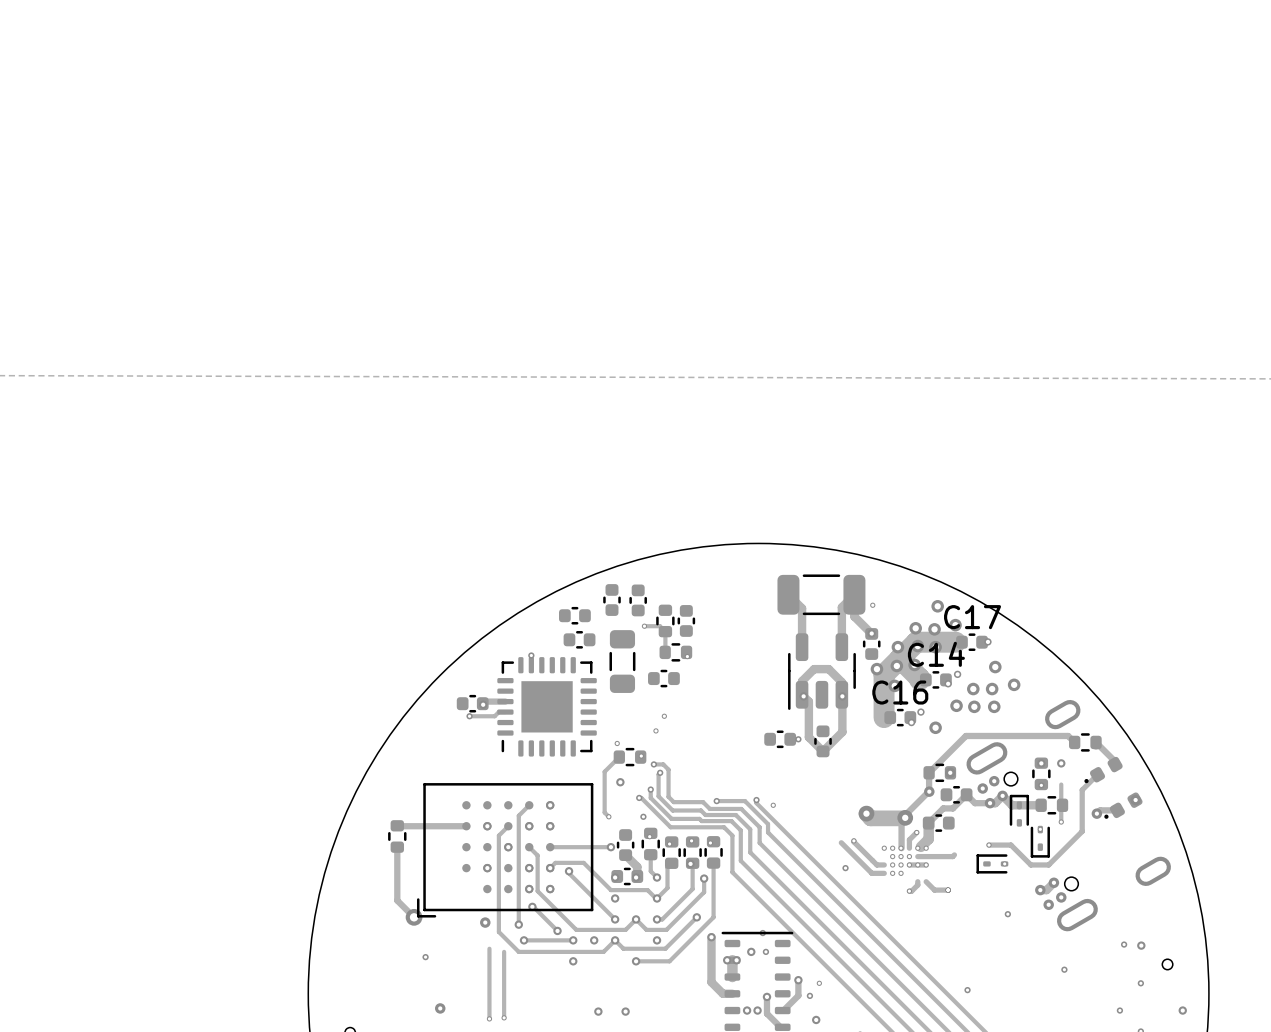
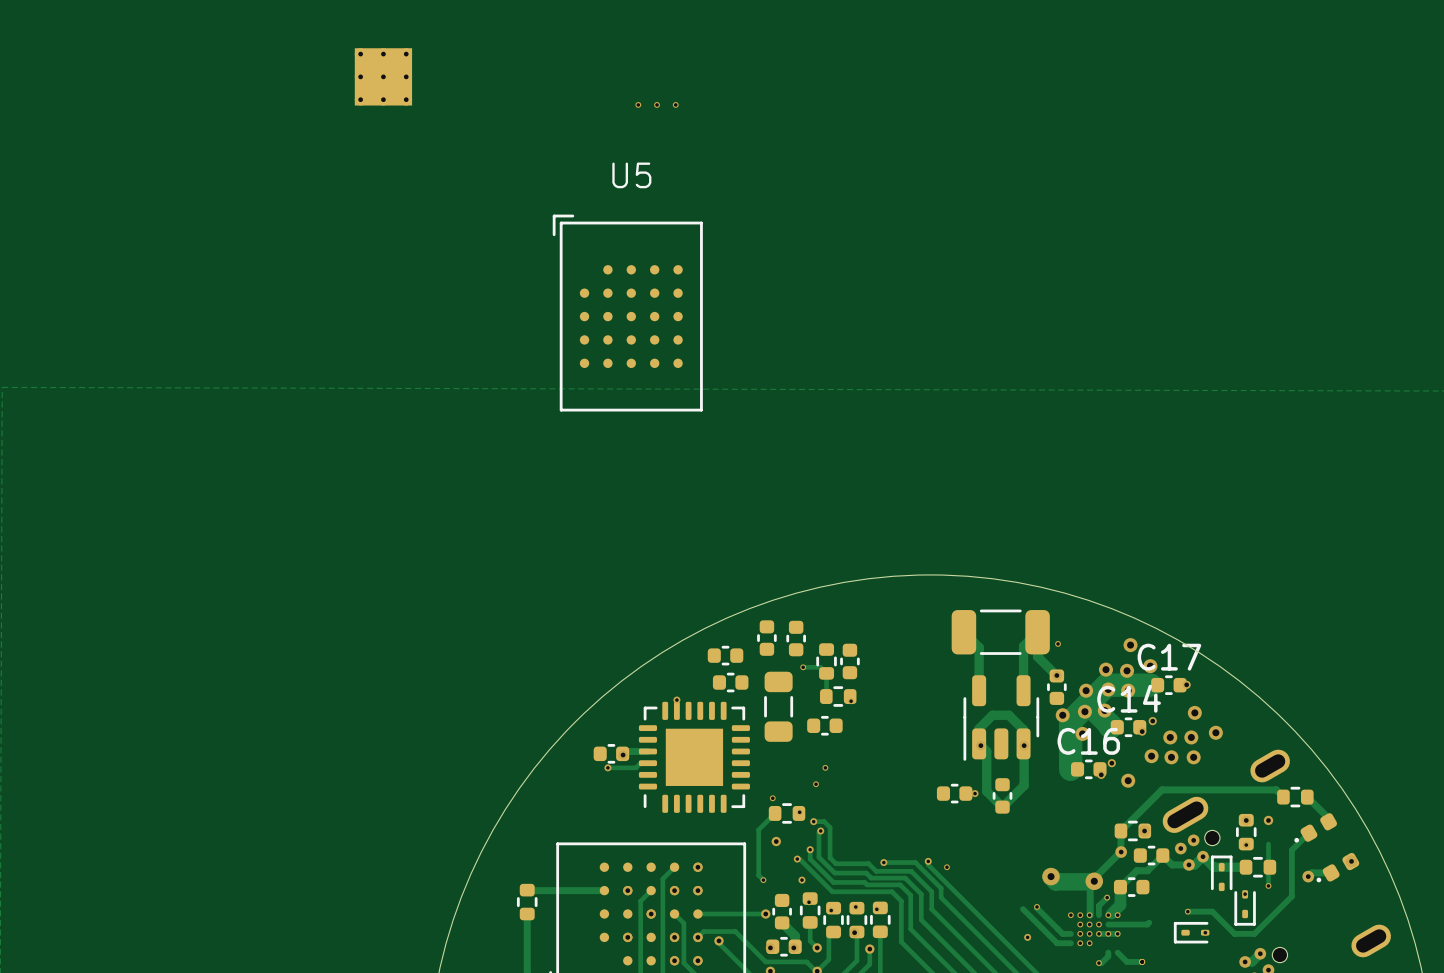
part: none -> (383, 76)
via: none -> (638, 104)
via: none -> (657, 104)
via: none -> (675, 104)
U5: none -> (627, 313)

